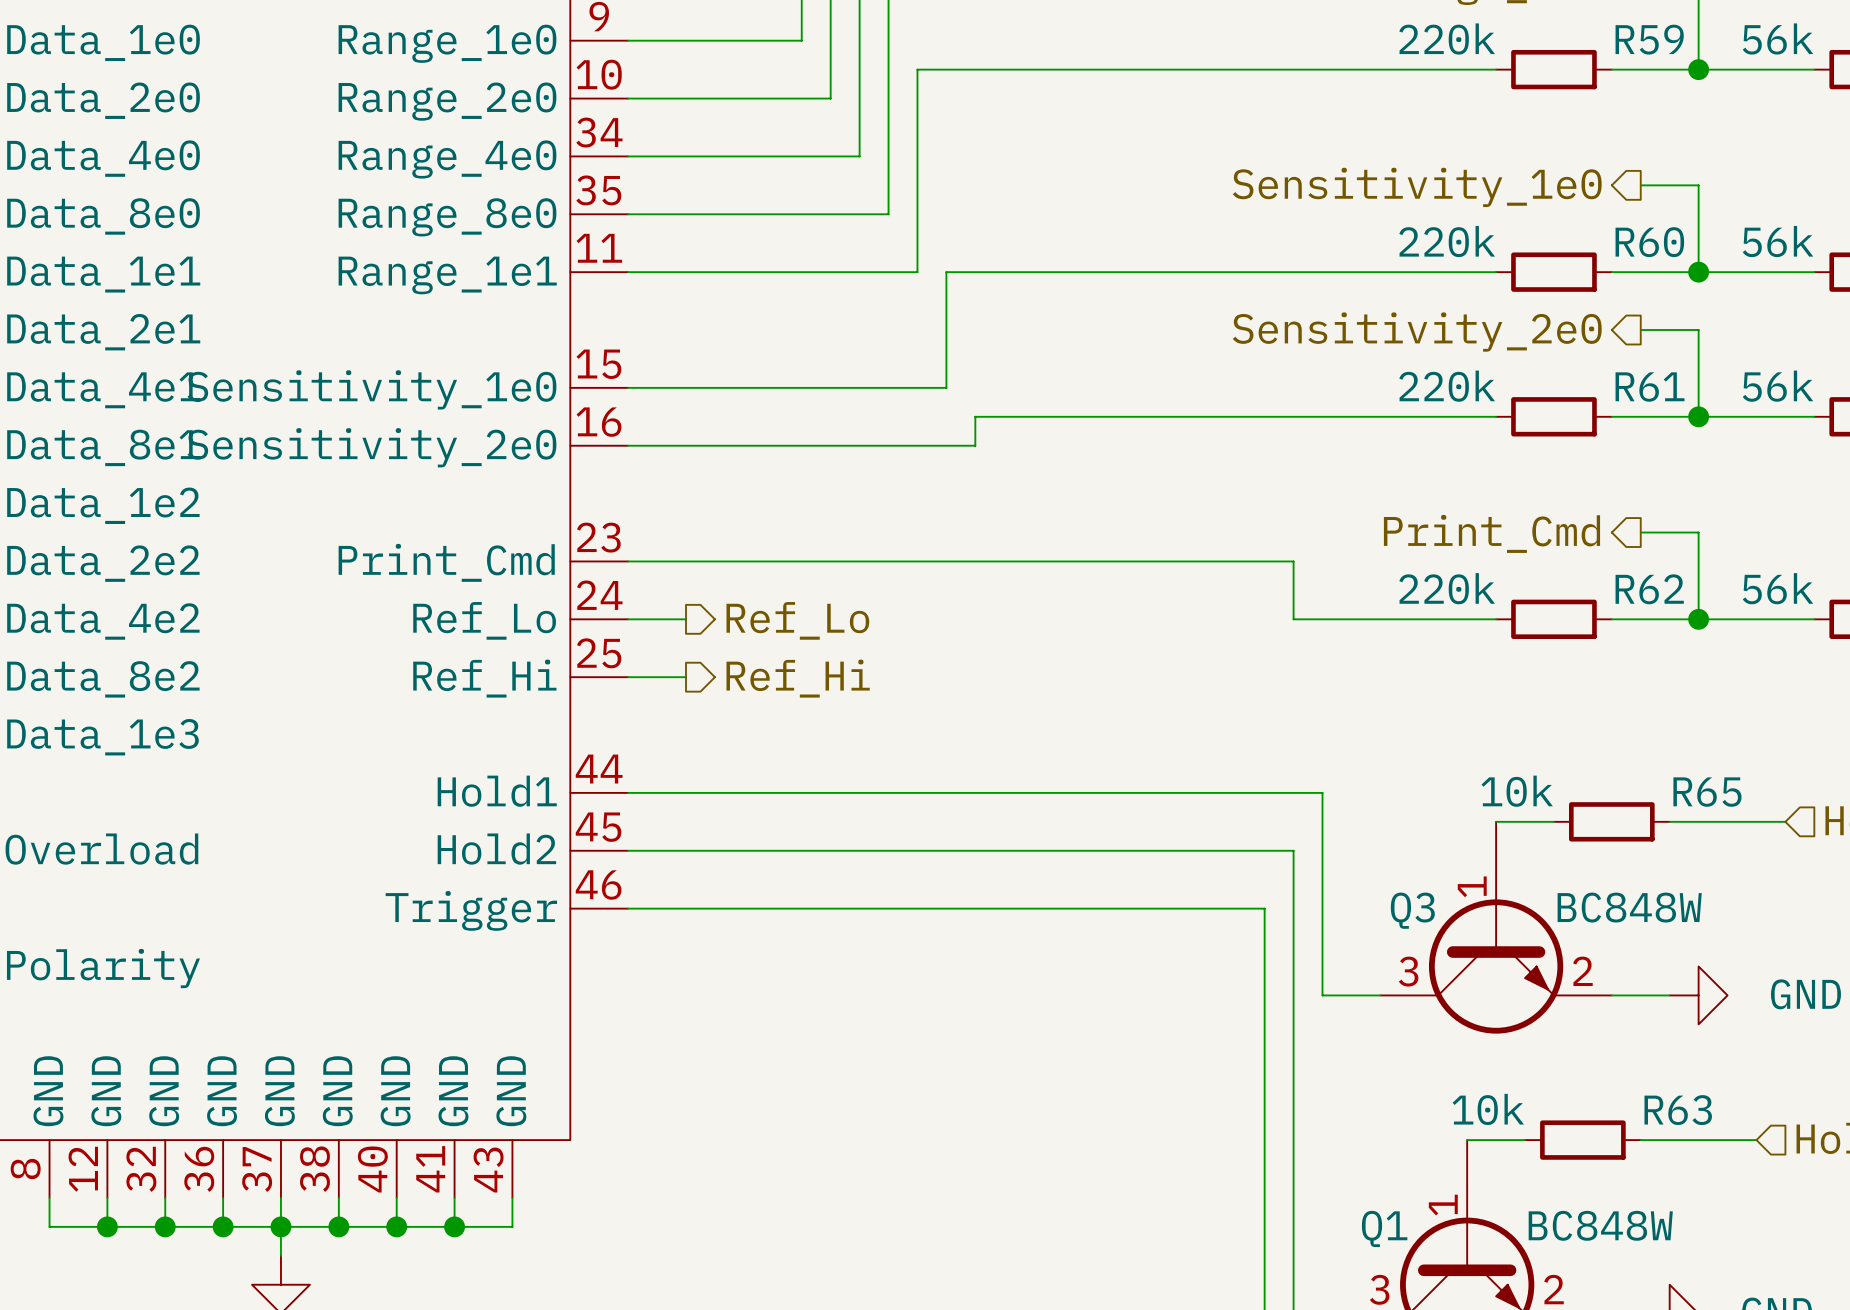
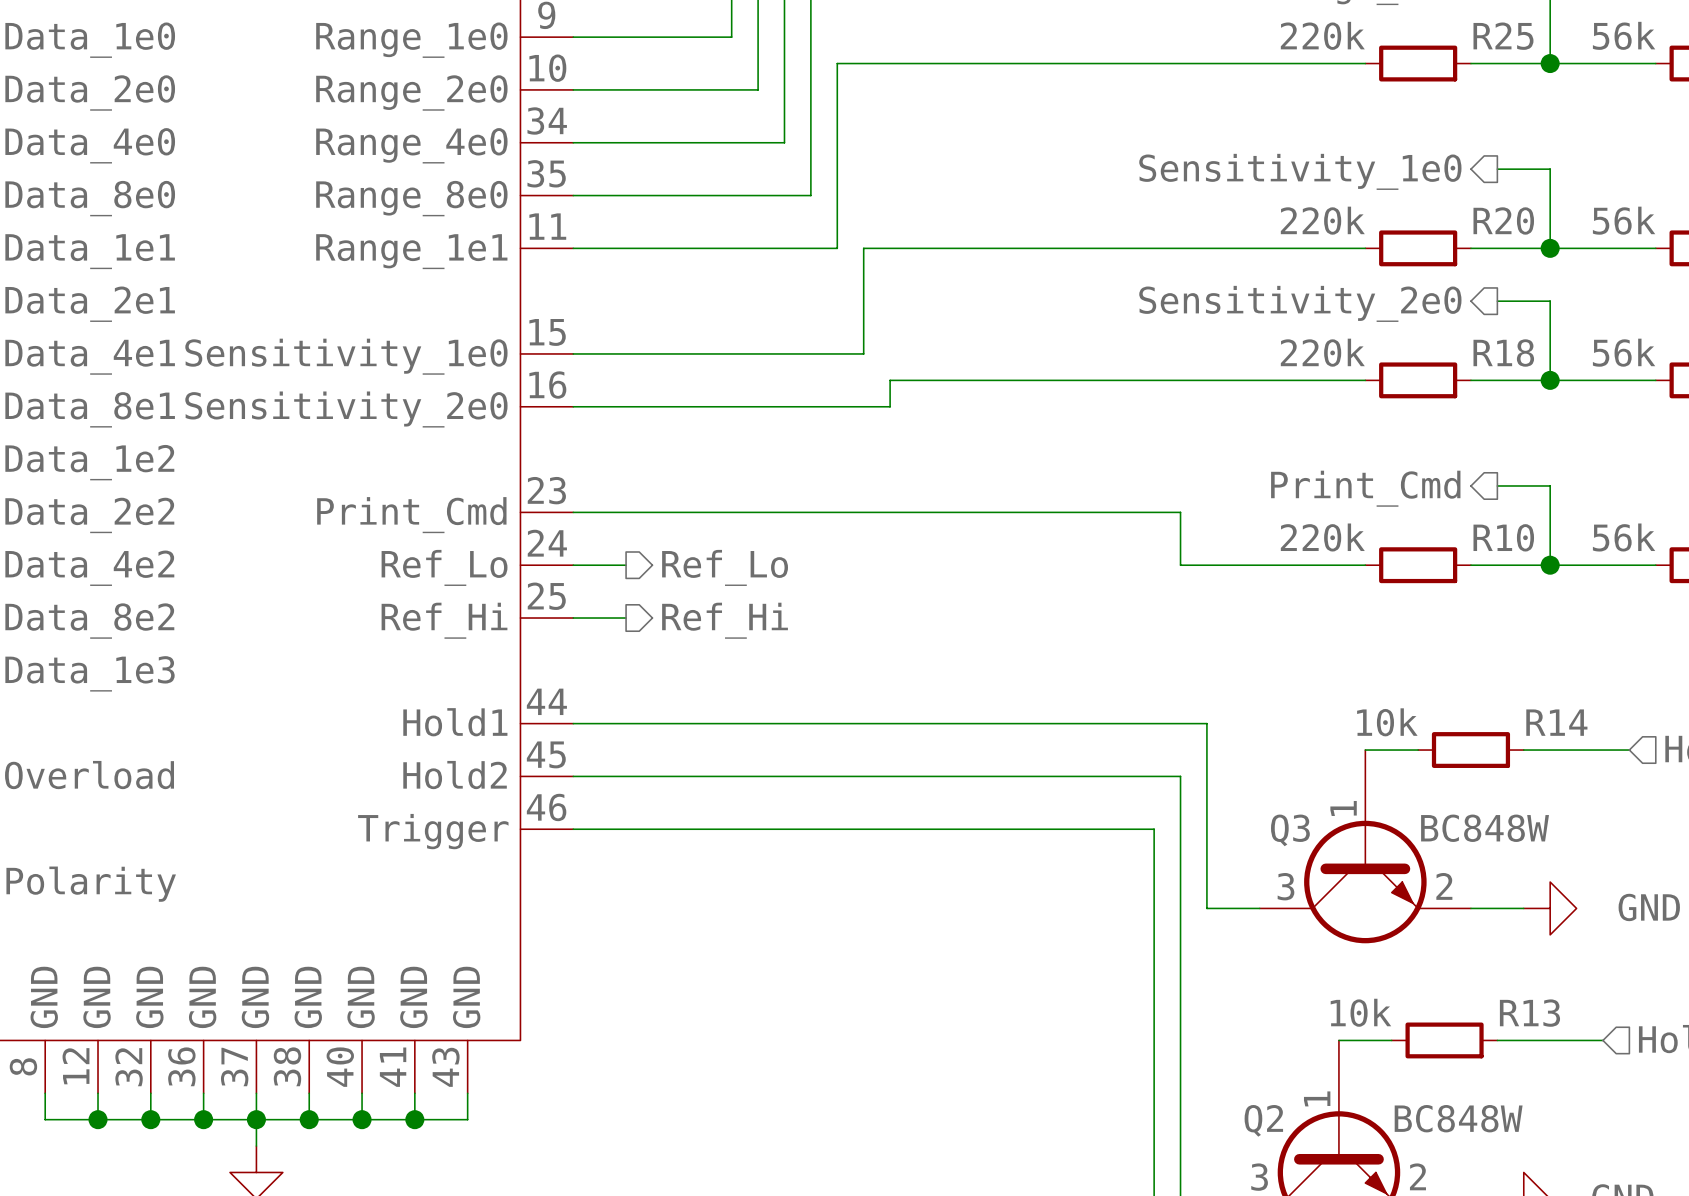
R59 name: R59 (1649, 39) -> R25 (1503, 36)
R60 name: R60 (1649, 242) -> R20 (1503, 220)
R61 name: R61 (1650, 387) -> R18 (1503, 353)
R62 name: R62 (1649, 589) -> R10 (1503, 537)
R65 name: R65 (1707, 792) -> R14 (1556, 722)
R63 name: R63 (1678, 1110) -> R13 (1529, 1013)
Q1 name: Q1 (1384, 1228) -> Q2 (1263, 1120)

